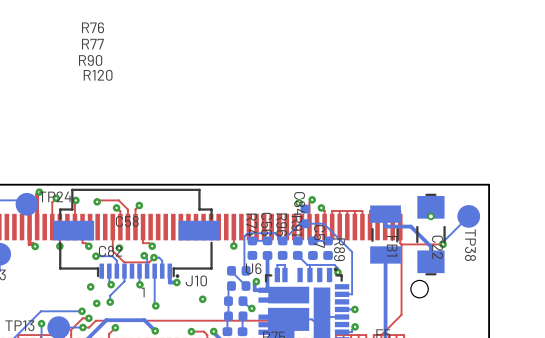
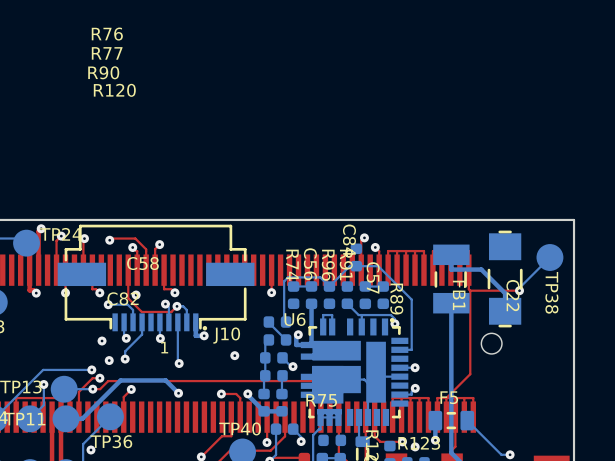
via: (299, 202) -> none
via: (430, 216) -> none

